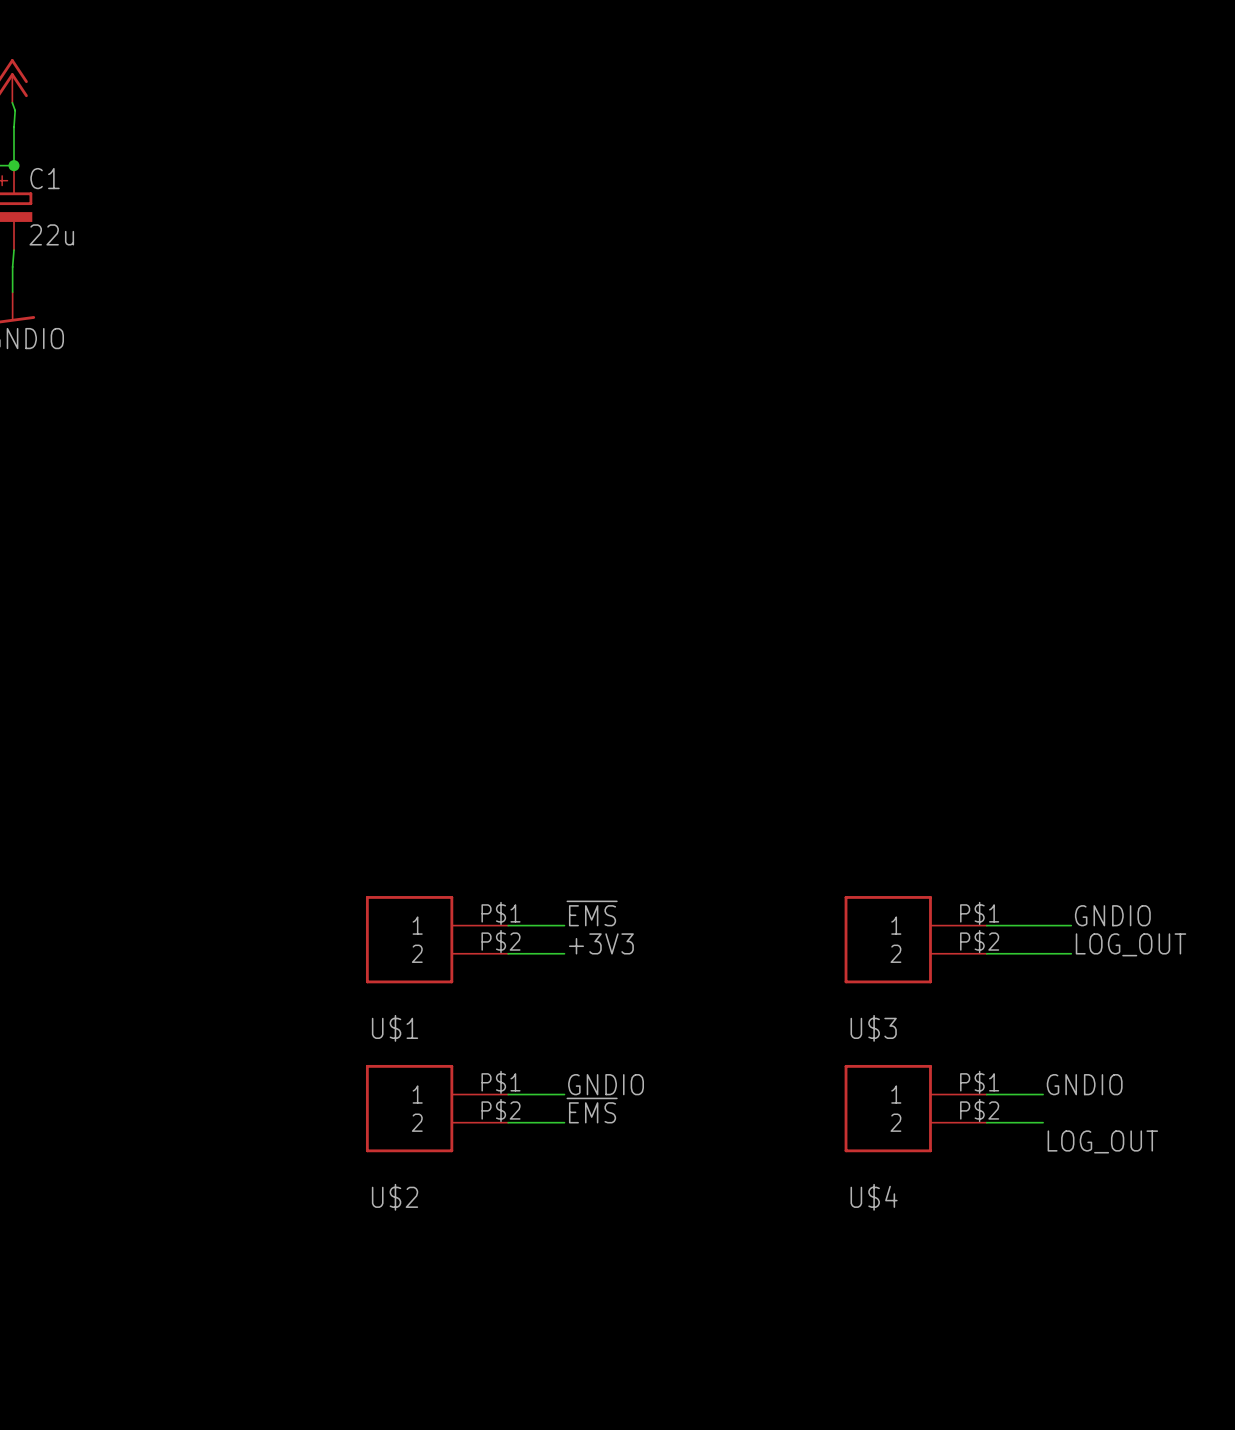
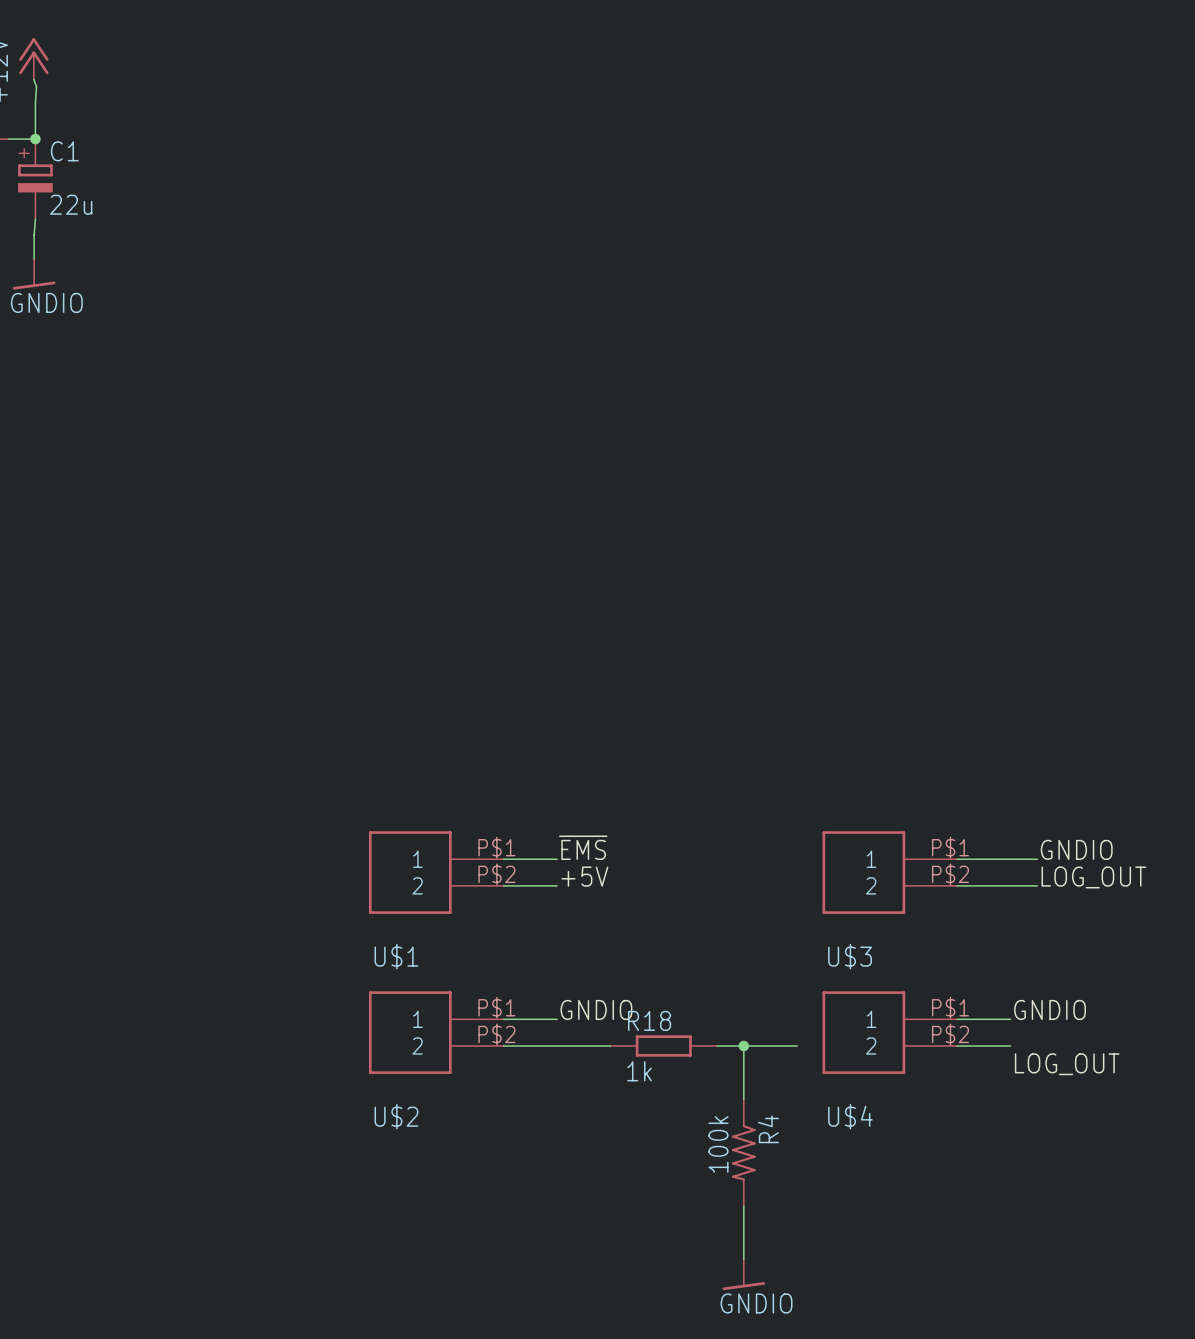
label: +3V3 (601, 943) -> +5V (584, 876)
label: ~{EMS} (592, 1110) -> none
wire: none -> (557, 1046) (610, 1046)
R18: none -> 1k (663, 1046)
wire: none -> (717, 1046) (797, 1046)
wire: none -> (743, 1046) (743, 1099)
junction: none -> (743, 1046)
R4: none -> 100k (743, 1152)
wire: none -> (743, 1206) (743, 1259)
power symbol: none -> GNDIO (743, 1274)

